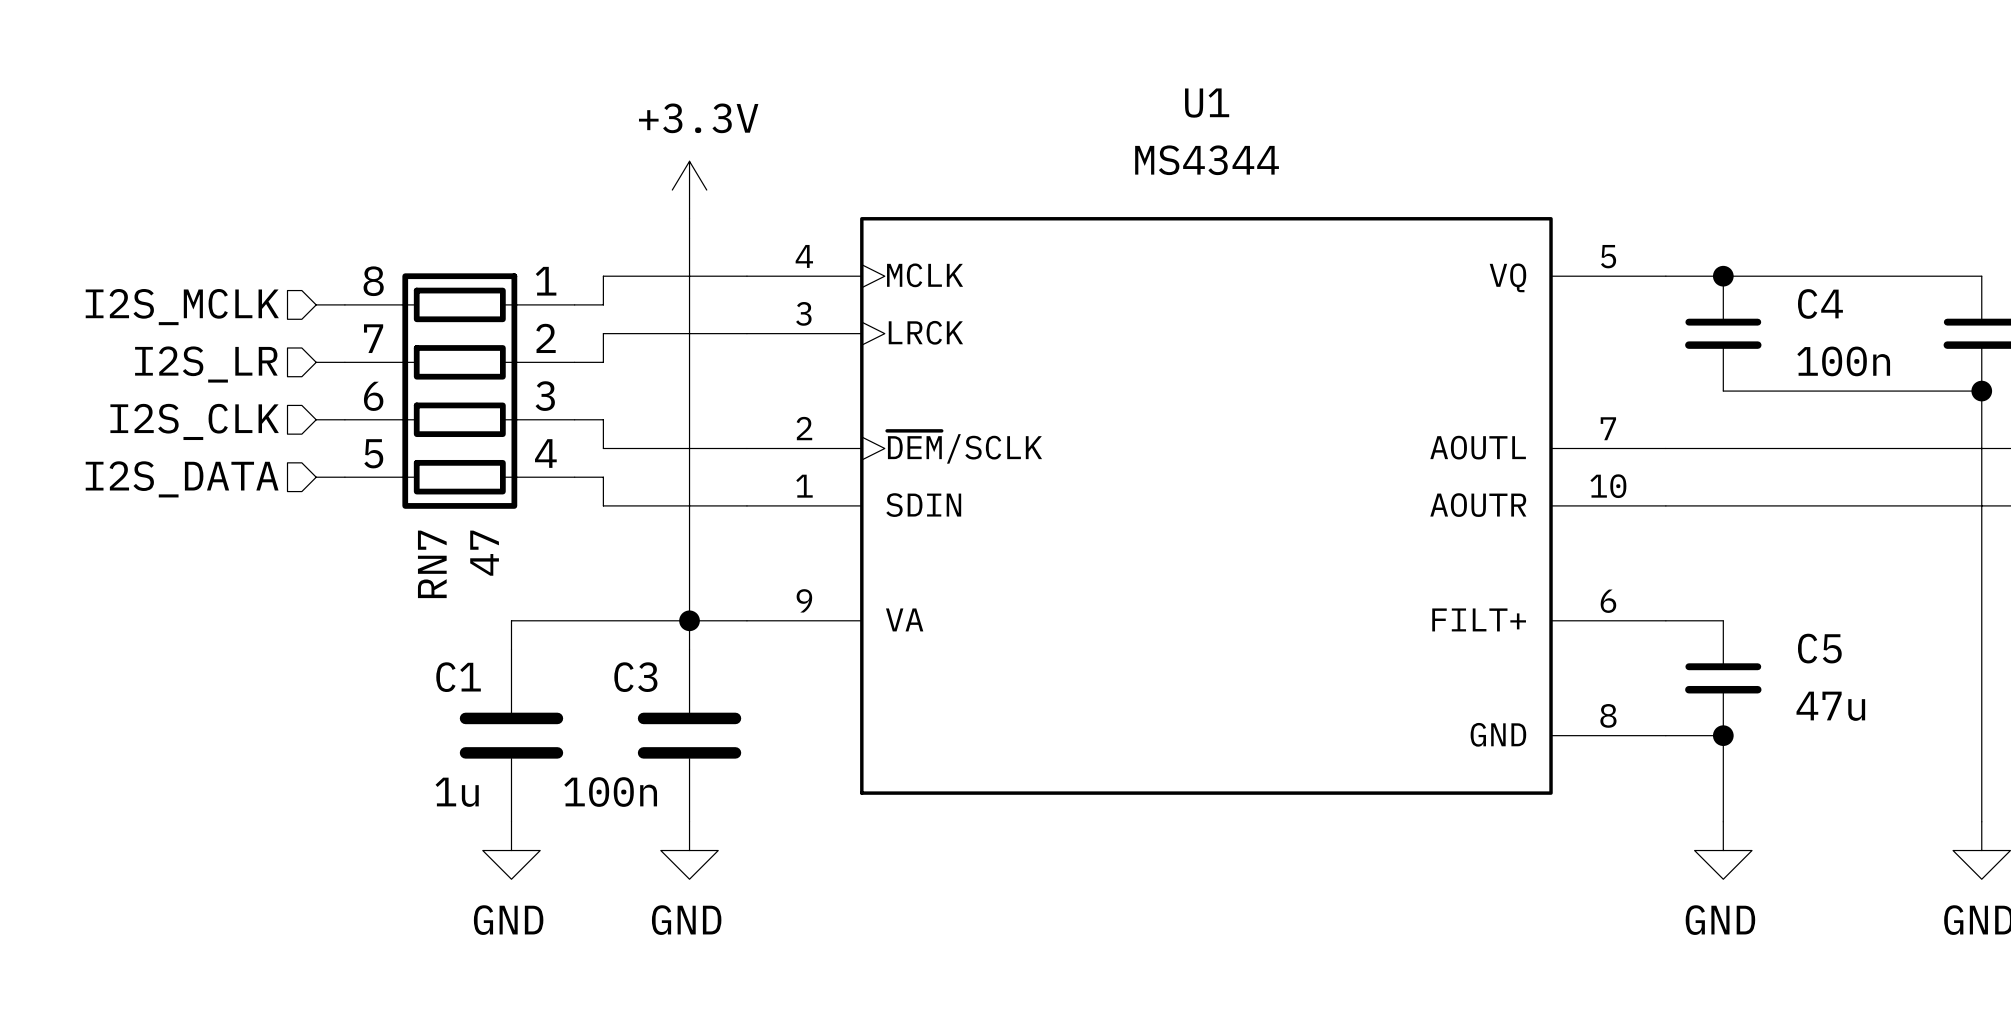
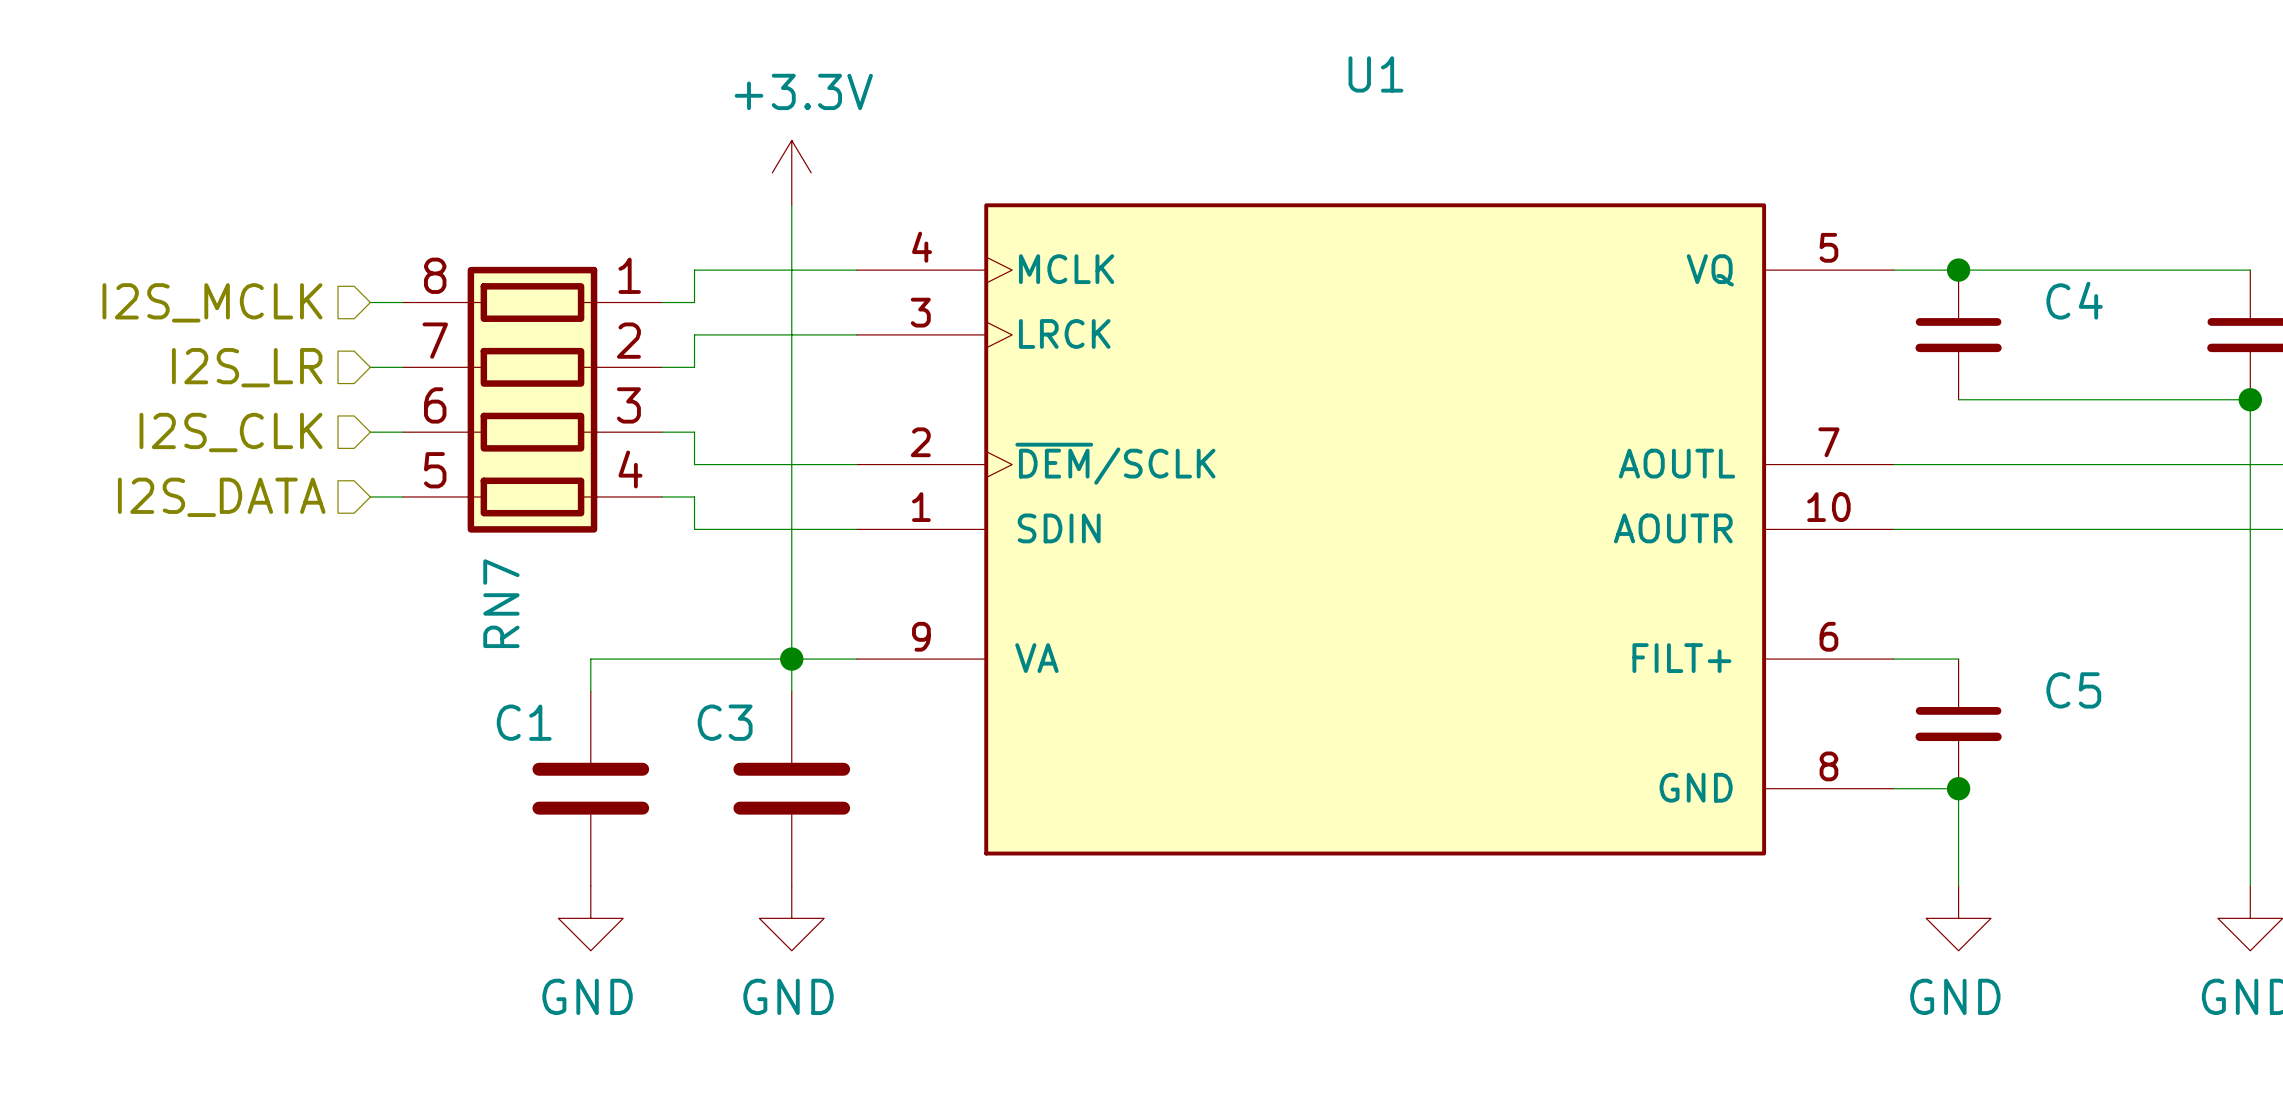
U1 value: MS4344 (1207, 160) -> none
C4 value: 100n (1843, 361) -> none
RN7 value: 47 (484, 553) -> none
C5 value: 47u (1830, 706) -> none
C1 value: 1u (457, 792) -> none
C3 value: 100n (610, 792) -> none

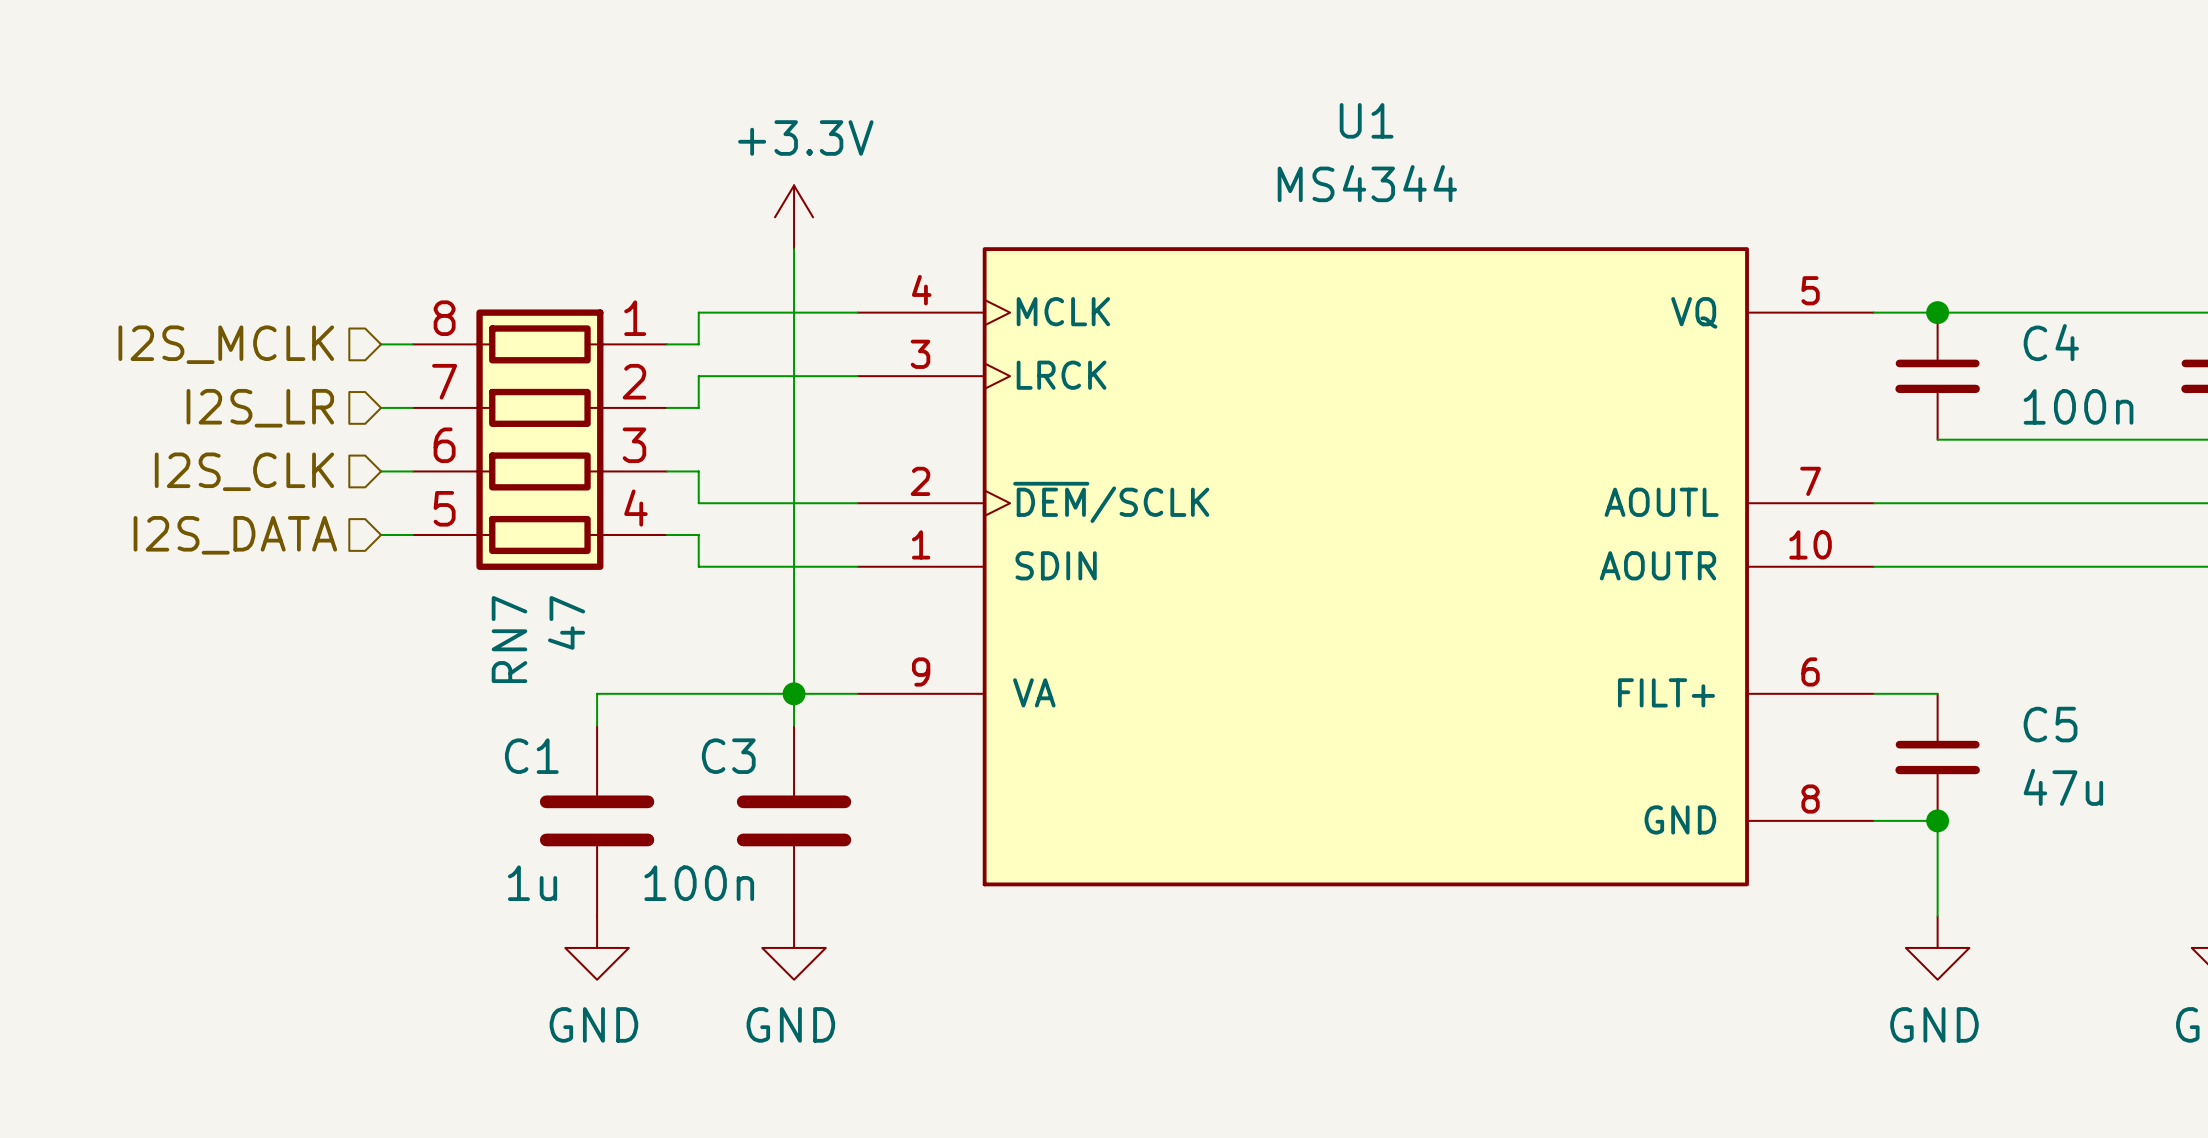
U1 value: none -> MS4344 (1367, 183)
C4 value: none -> 100n (2078, 406)
RN7 value: none -> 47 (566, 622)
C5 value: none -> 47u (2063, 787)
C1 value: none -> 1u (532, 883)
C3 value: none -> 100n (699, 883)

